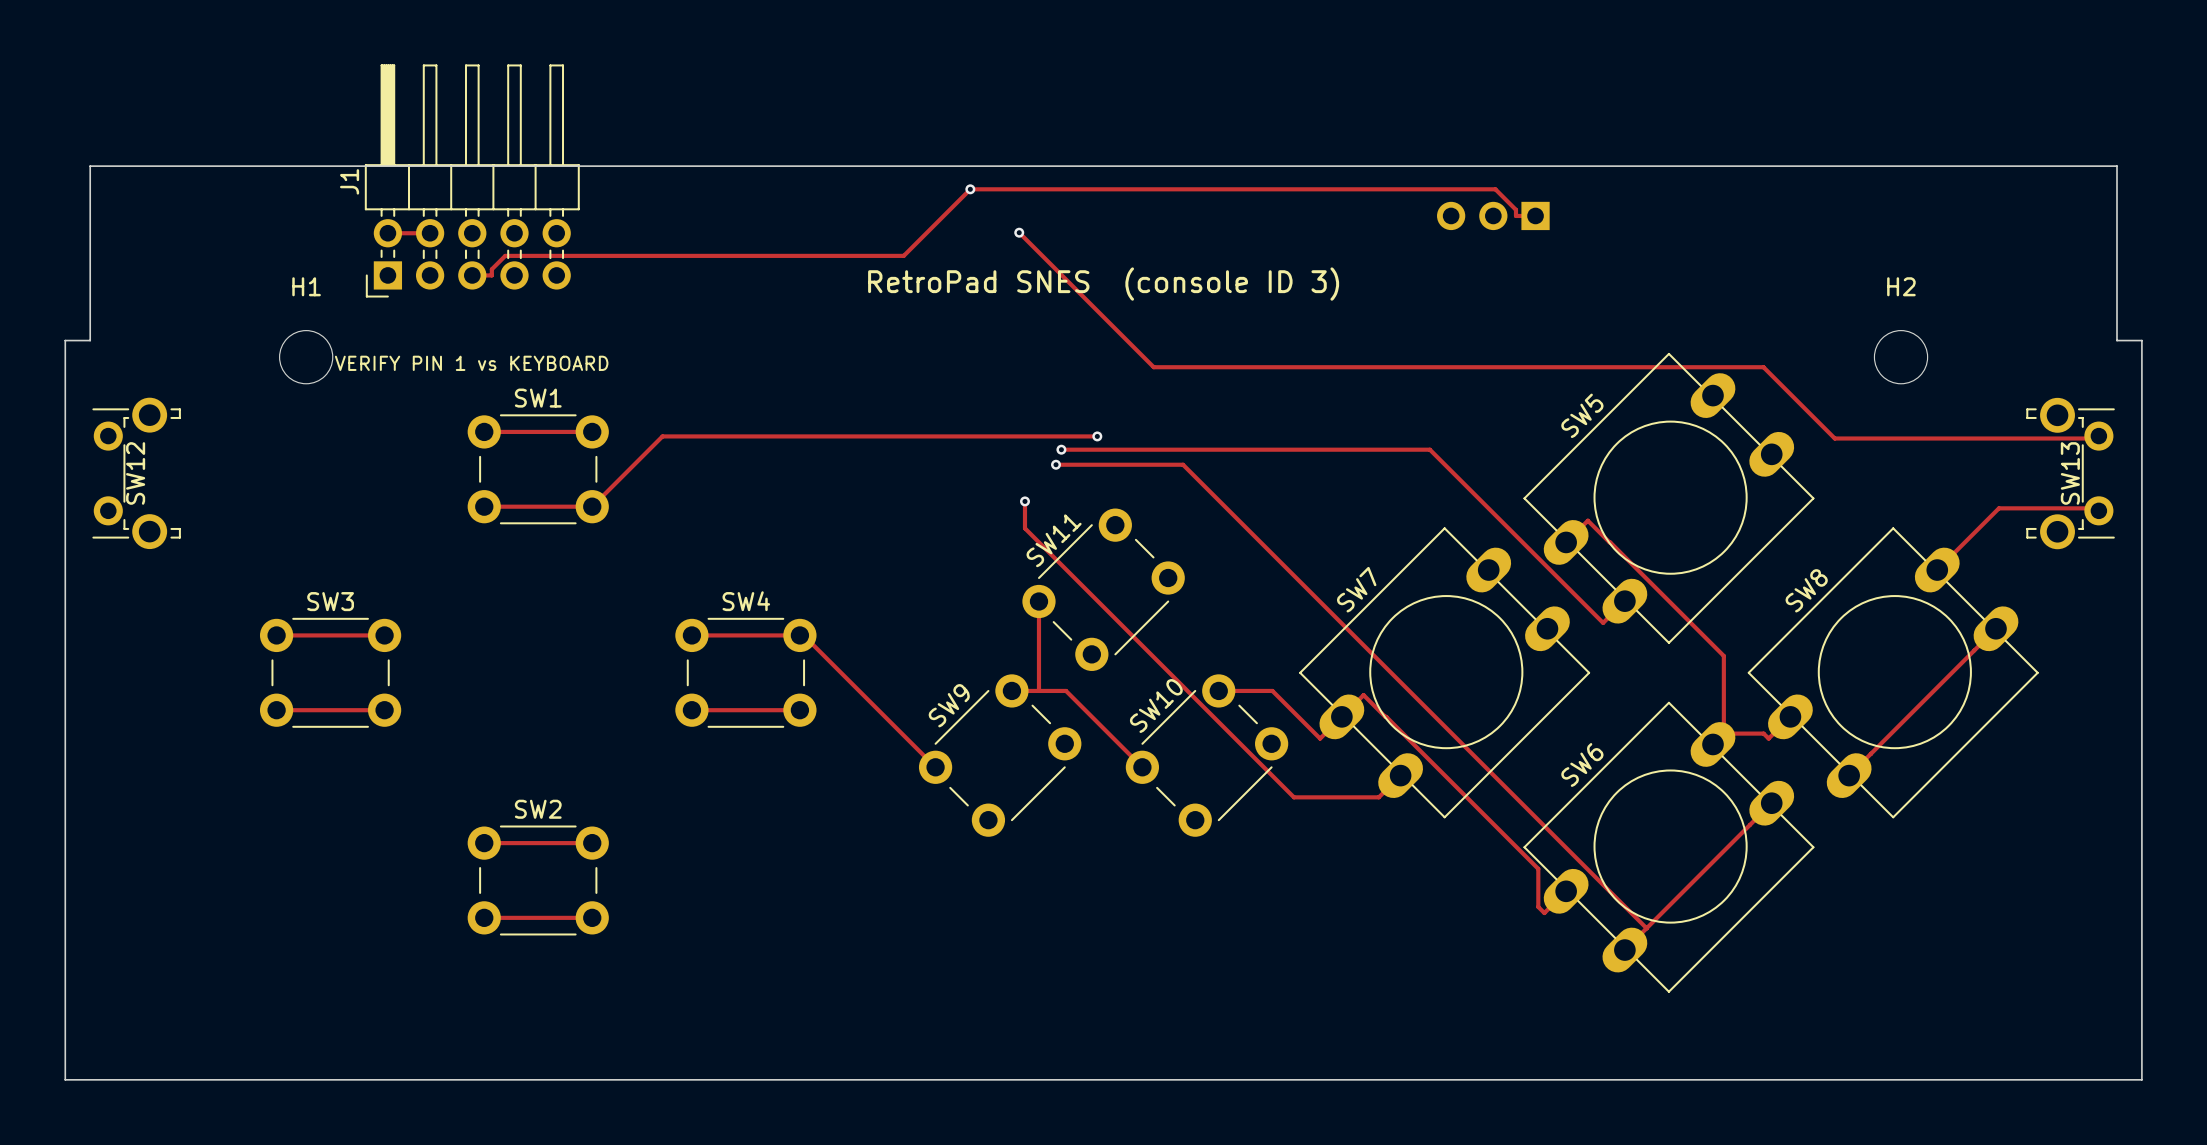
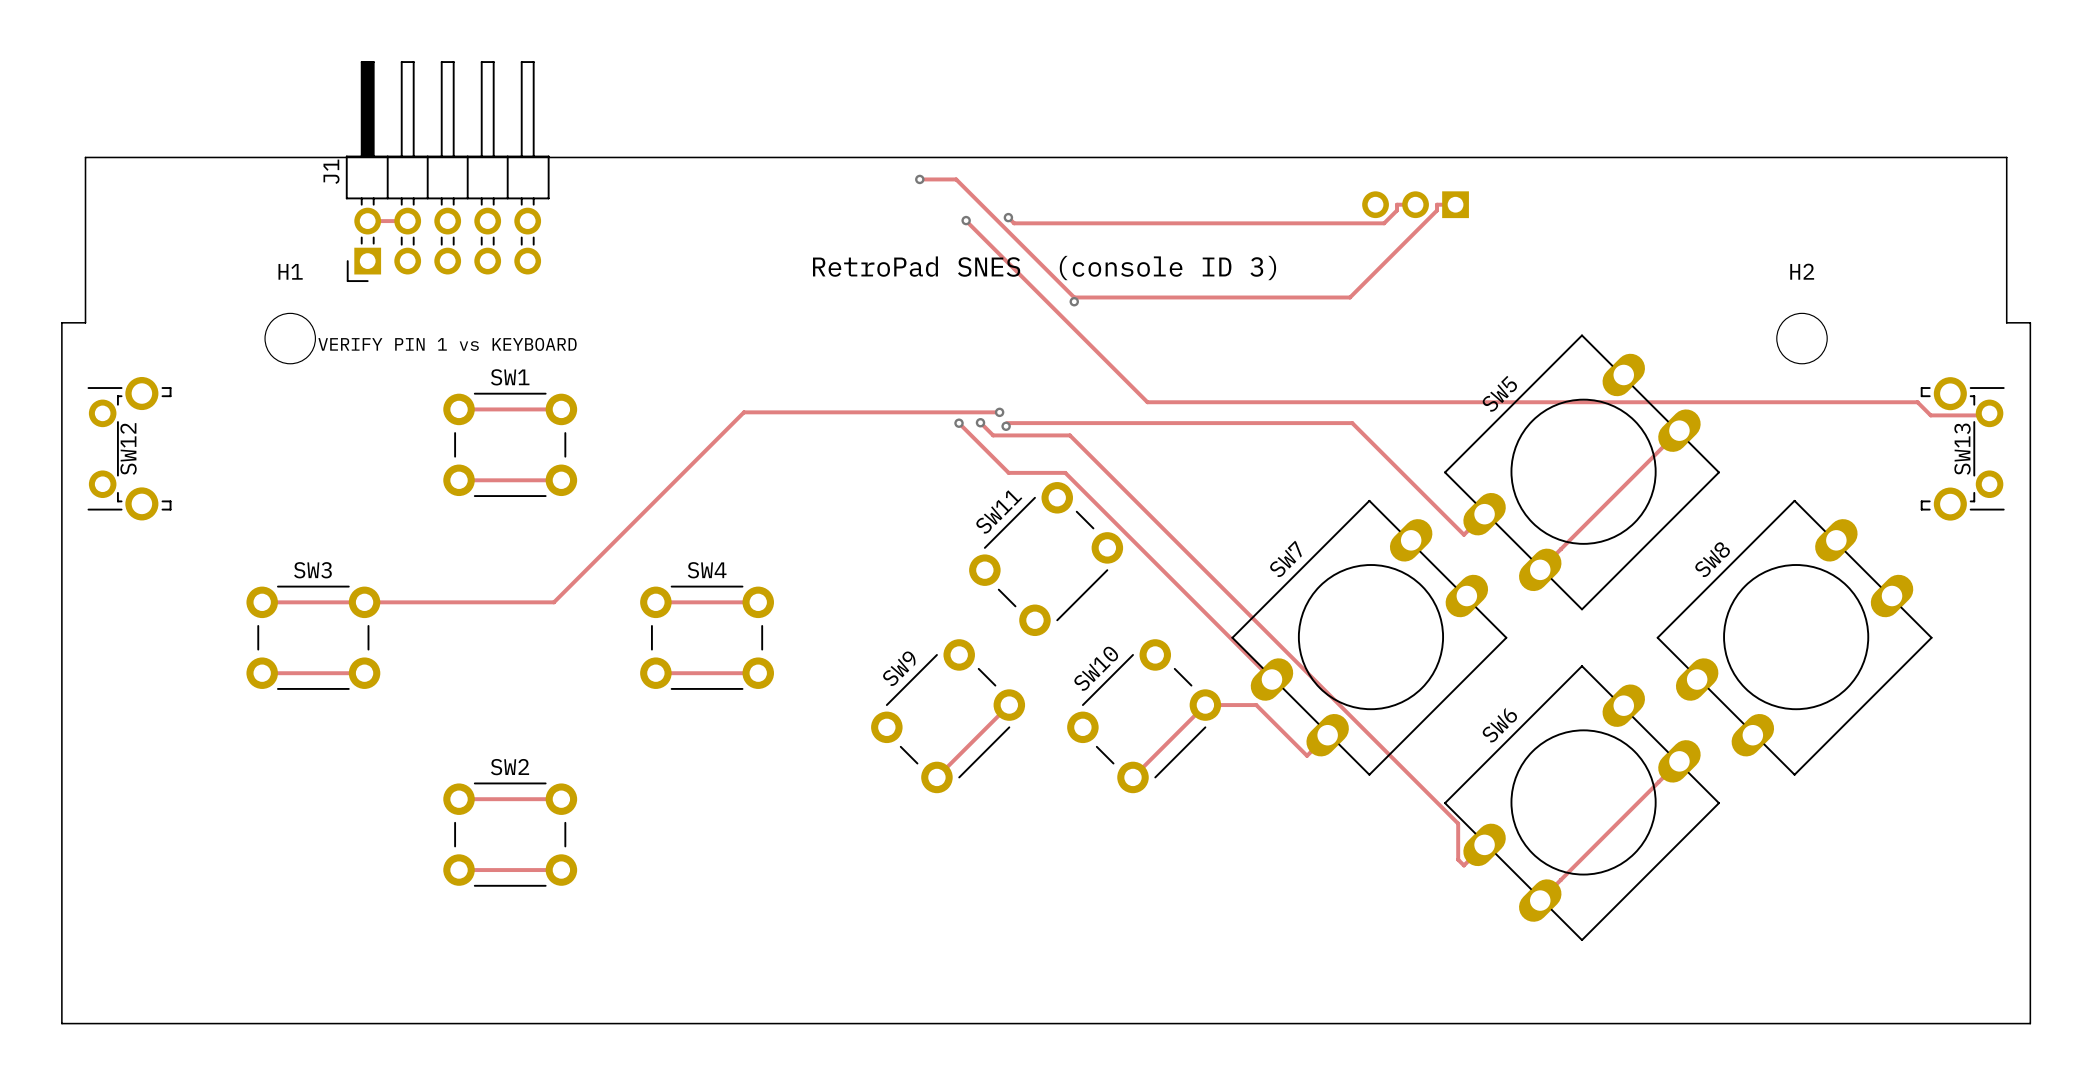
track: (970, 189) (903, 255) (505, 255) (491, 269) (491, 275) (472, 275) -> none
track: (1008, 189) (1495, 189) (1515, 209) (1515, 215) -> (1074, 297) (1350, 297) (1437, 210) (1437, 204)
track: none -> (956, 179) (1074, 297)
track: none -> (1415, 204) (1397, 204) (1397, 210) (1384, 223) (1014, 223) (1008, 217)
via: none -> (1008, 217)
track: (1019, 232) (1153, 367) (1763, 367) (1834, 438) (2096, 438) -> (966, 220) (1147, 402) (1917, 402) (1930, 415) (1987, 415)
via: none -> (1074, 301)
track: none -> (999, 412) (743, 412) (553, 602) (364, 602)
via: none -> (999, 412)
track: (1097, 436) (662, 436) (592, 506) -> none
via: (1097, 436) -> none
via: none -> (980, 422)
track: none -> (959, 423) (1008, 472) (1065, 472) (1271, 679)
via: none -> (959, 423)
track: (1061, 449) (1429, 449) (1603, 622) (1624, 601) -> (1679, 430) (1540, 569)
track: (1056, 464) (1183, 464) (1646, 928) -> none
via: (1056, 464) -> none
track: (1024, 501) (1024, 528) (1293, 797) (1378, 797) -> (1133, 777) (1205, 705) (1256, 705) (1307, 755)
via: (1024, 501) -> none
track: (2098, 510) (2096, 508) (1998, 508) (1937, 570) -> none
track: (1566, 542) (1587, 520) (1723, 656) (1723, 733) -> (1484, 514) (1463, 534) (1352, 423) (1006, 423)
track: (1038, 601) (1038, 690) -> none
track: (1996, 628) (1849, 775) -> none
track: (799, 635) (803, 635) (935, 767) -> none
track: (1011, 690) (1066, 690) (1142, 767) -> none
track: (1218, 690) (1272, 690) (1320, 738) (1363, 695) (1386, 716) -> (980, 422) (993, 435) (1069, 435) (1314, 679)
track: (1790, 716) (1768, 738) (1763, 733) (1723, 733) -> none
track: none -> (1009, 705) (936, 777)

